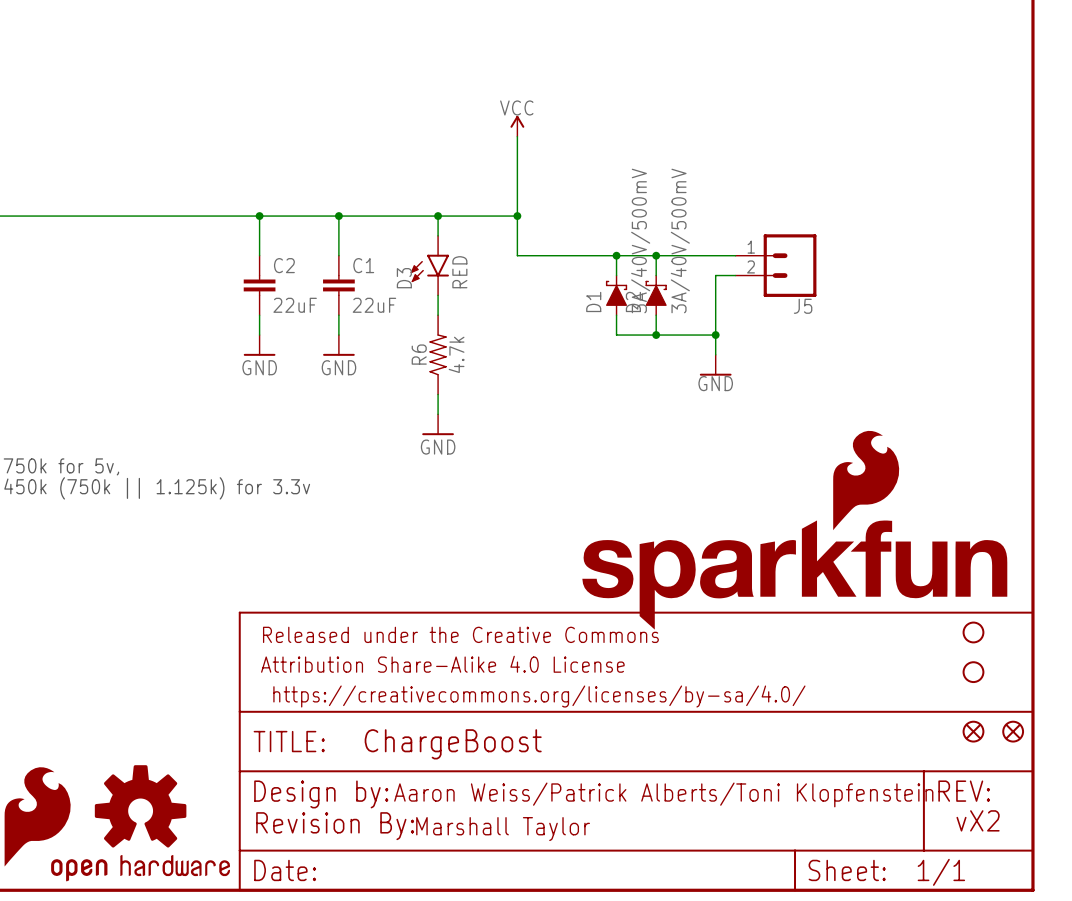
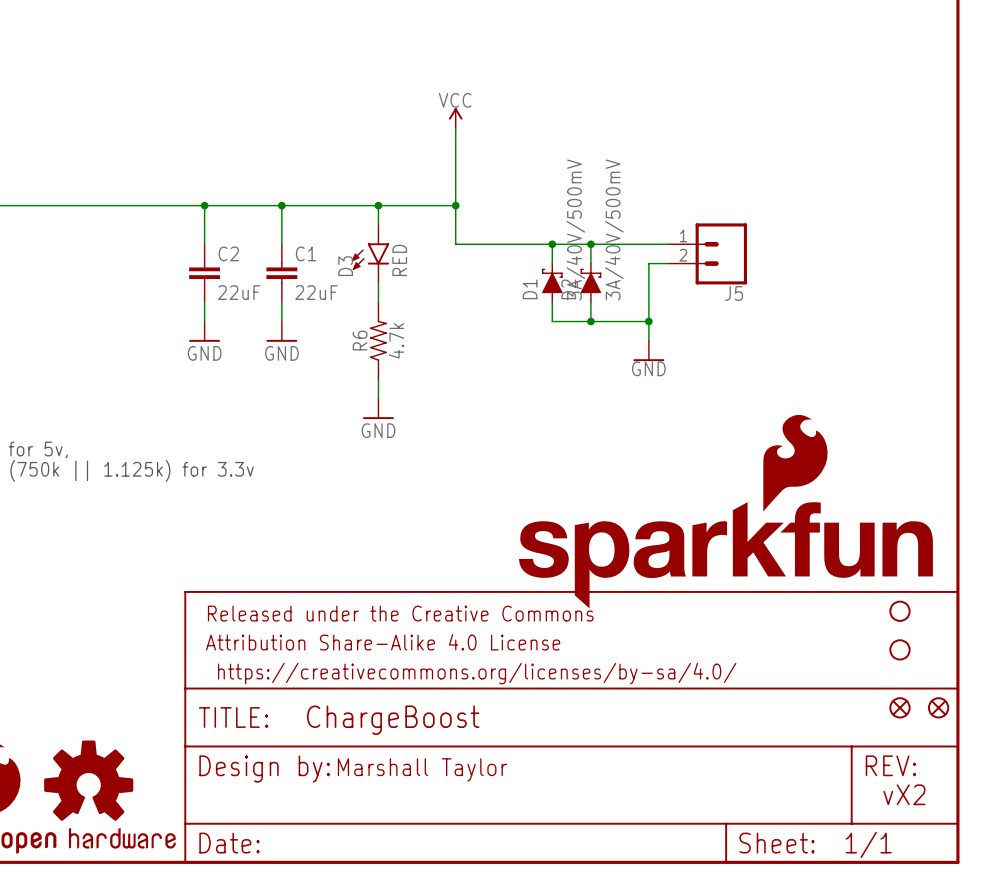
text: Aaron Weiss/Patrick Alberts/Toni Klopfenstein (663, 794) -> Marshall Taylor (422, 769)
part: (335, 826) -> none
text: Marshall Taylor (503, 829) -> none

